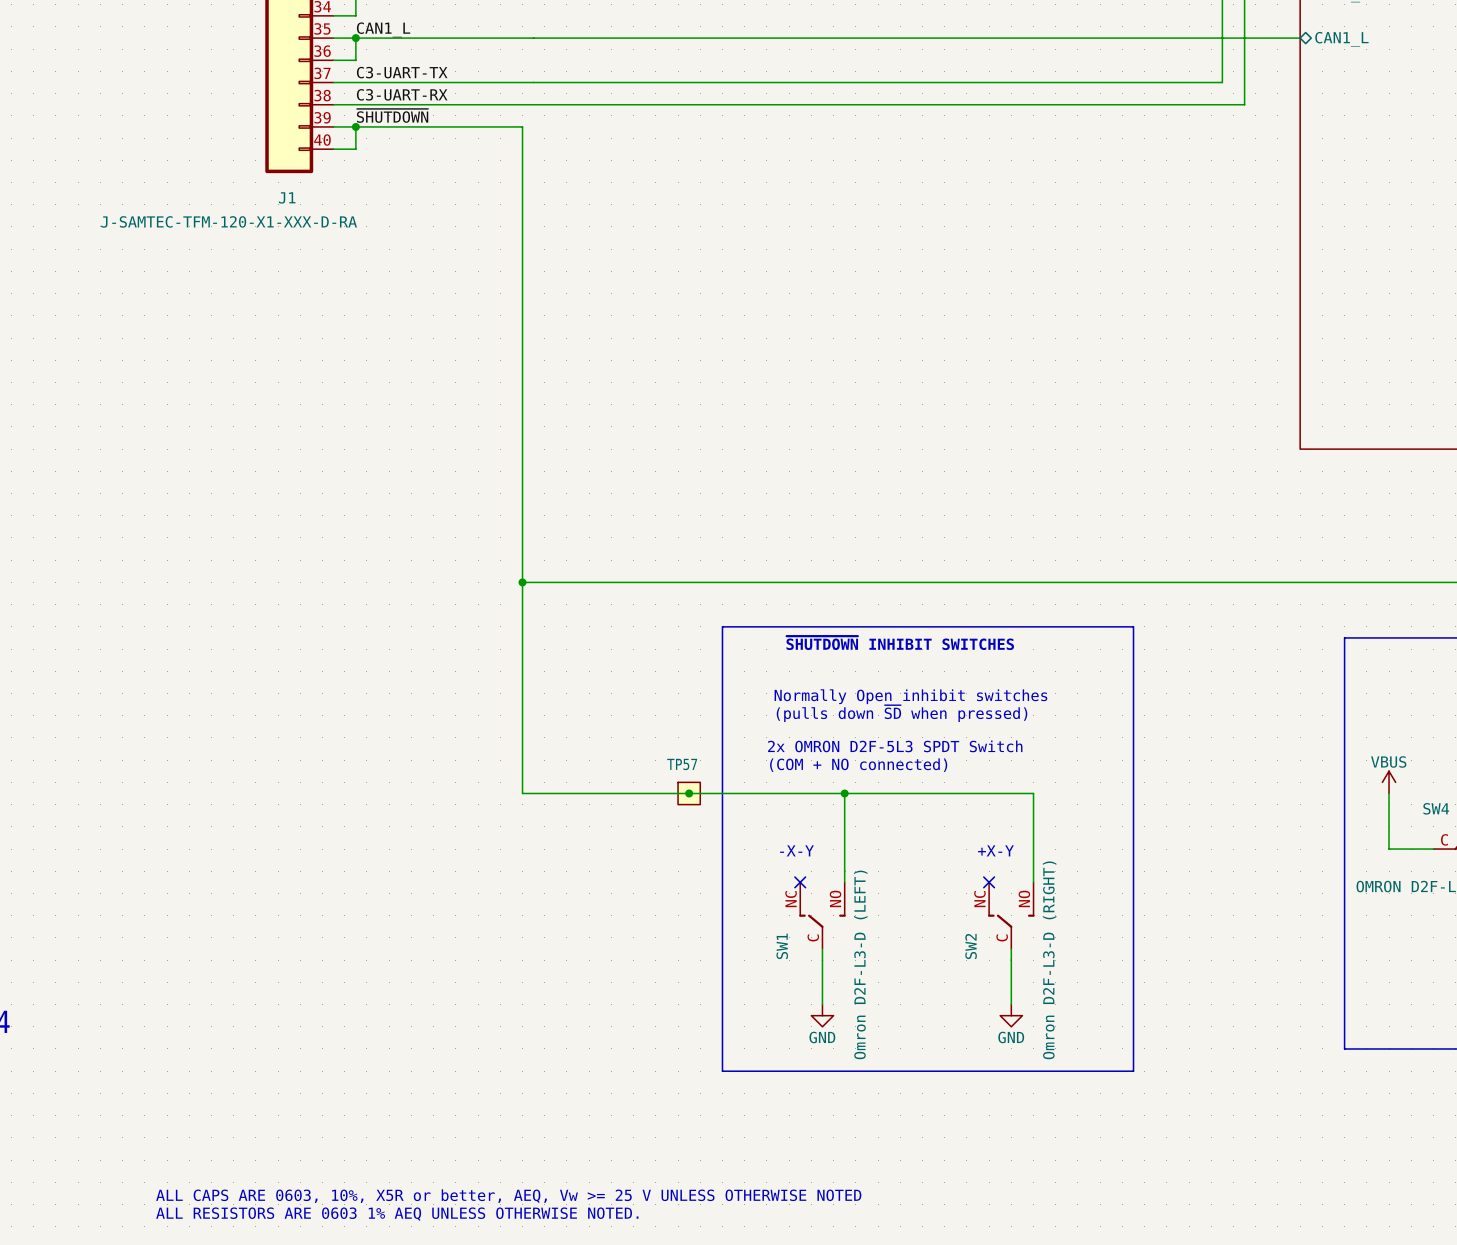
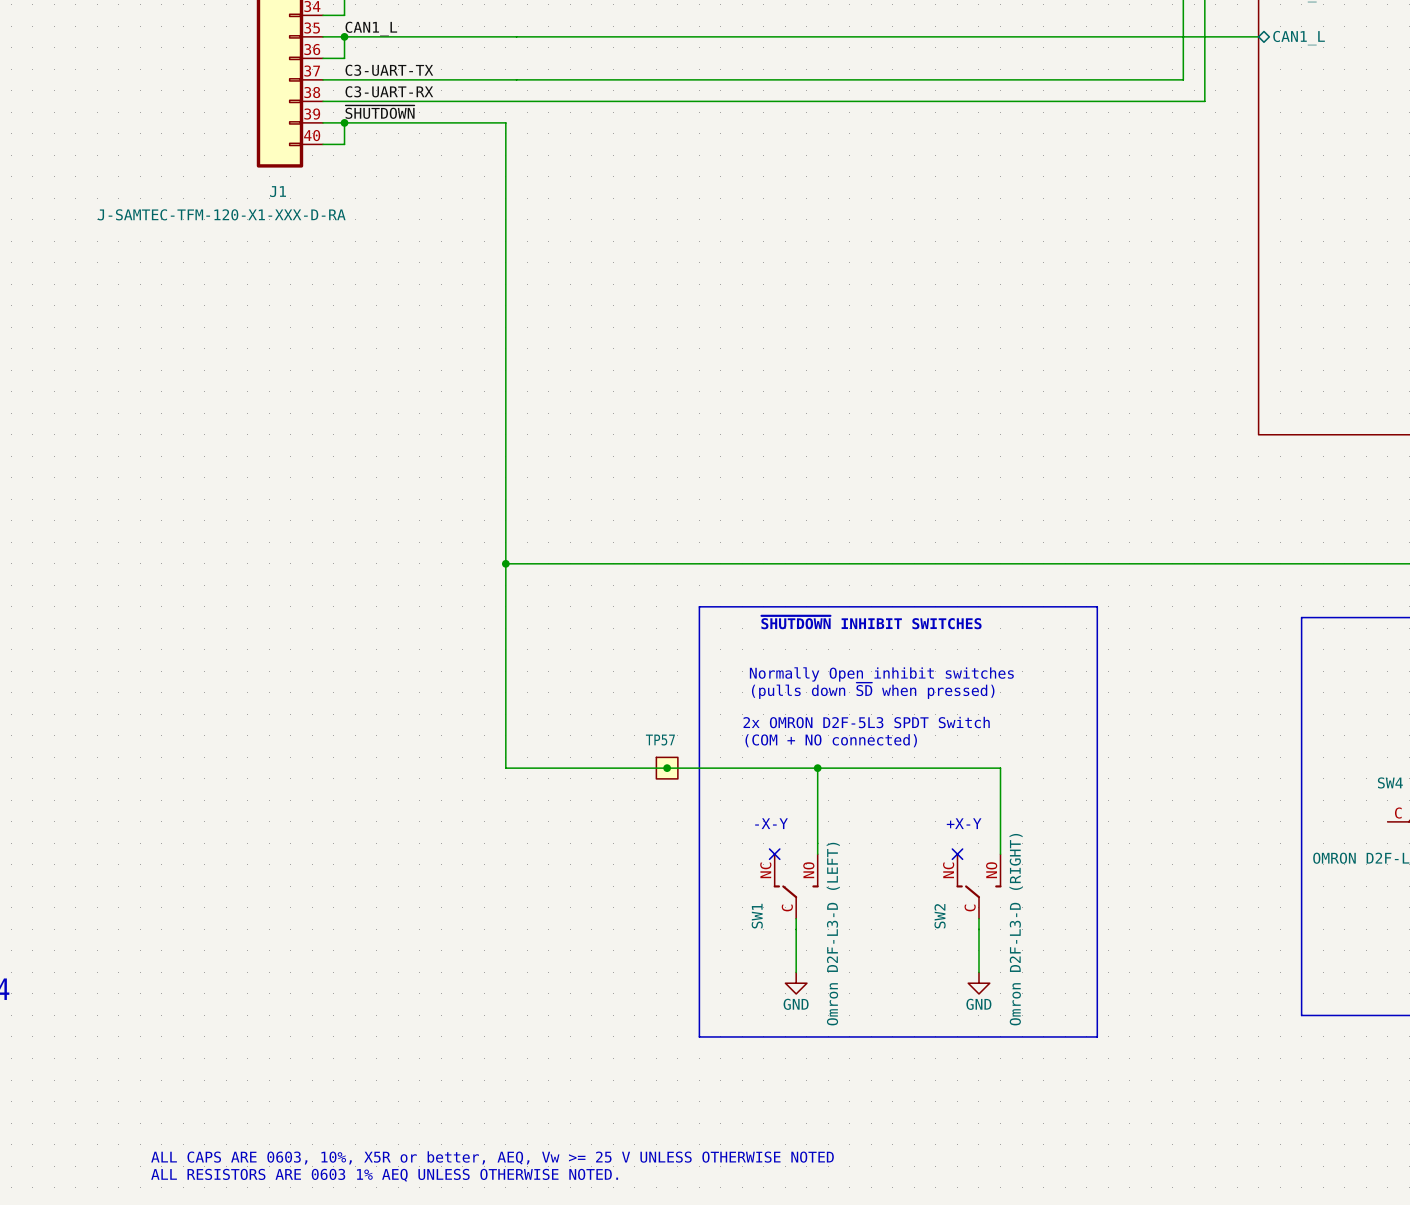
power symbol: VBUS (1389, 782) -> none
wire: (1389, 793) (1389, 849) (1433, 849) -> none

